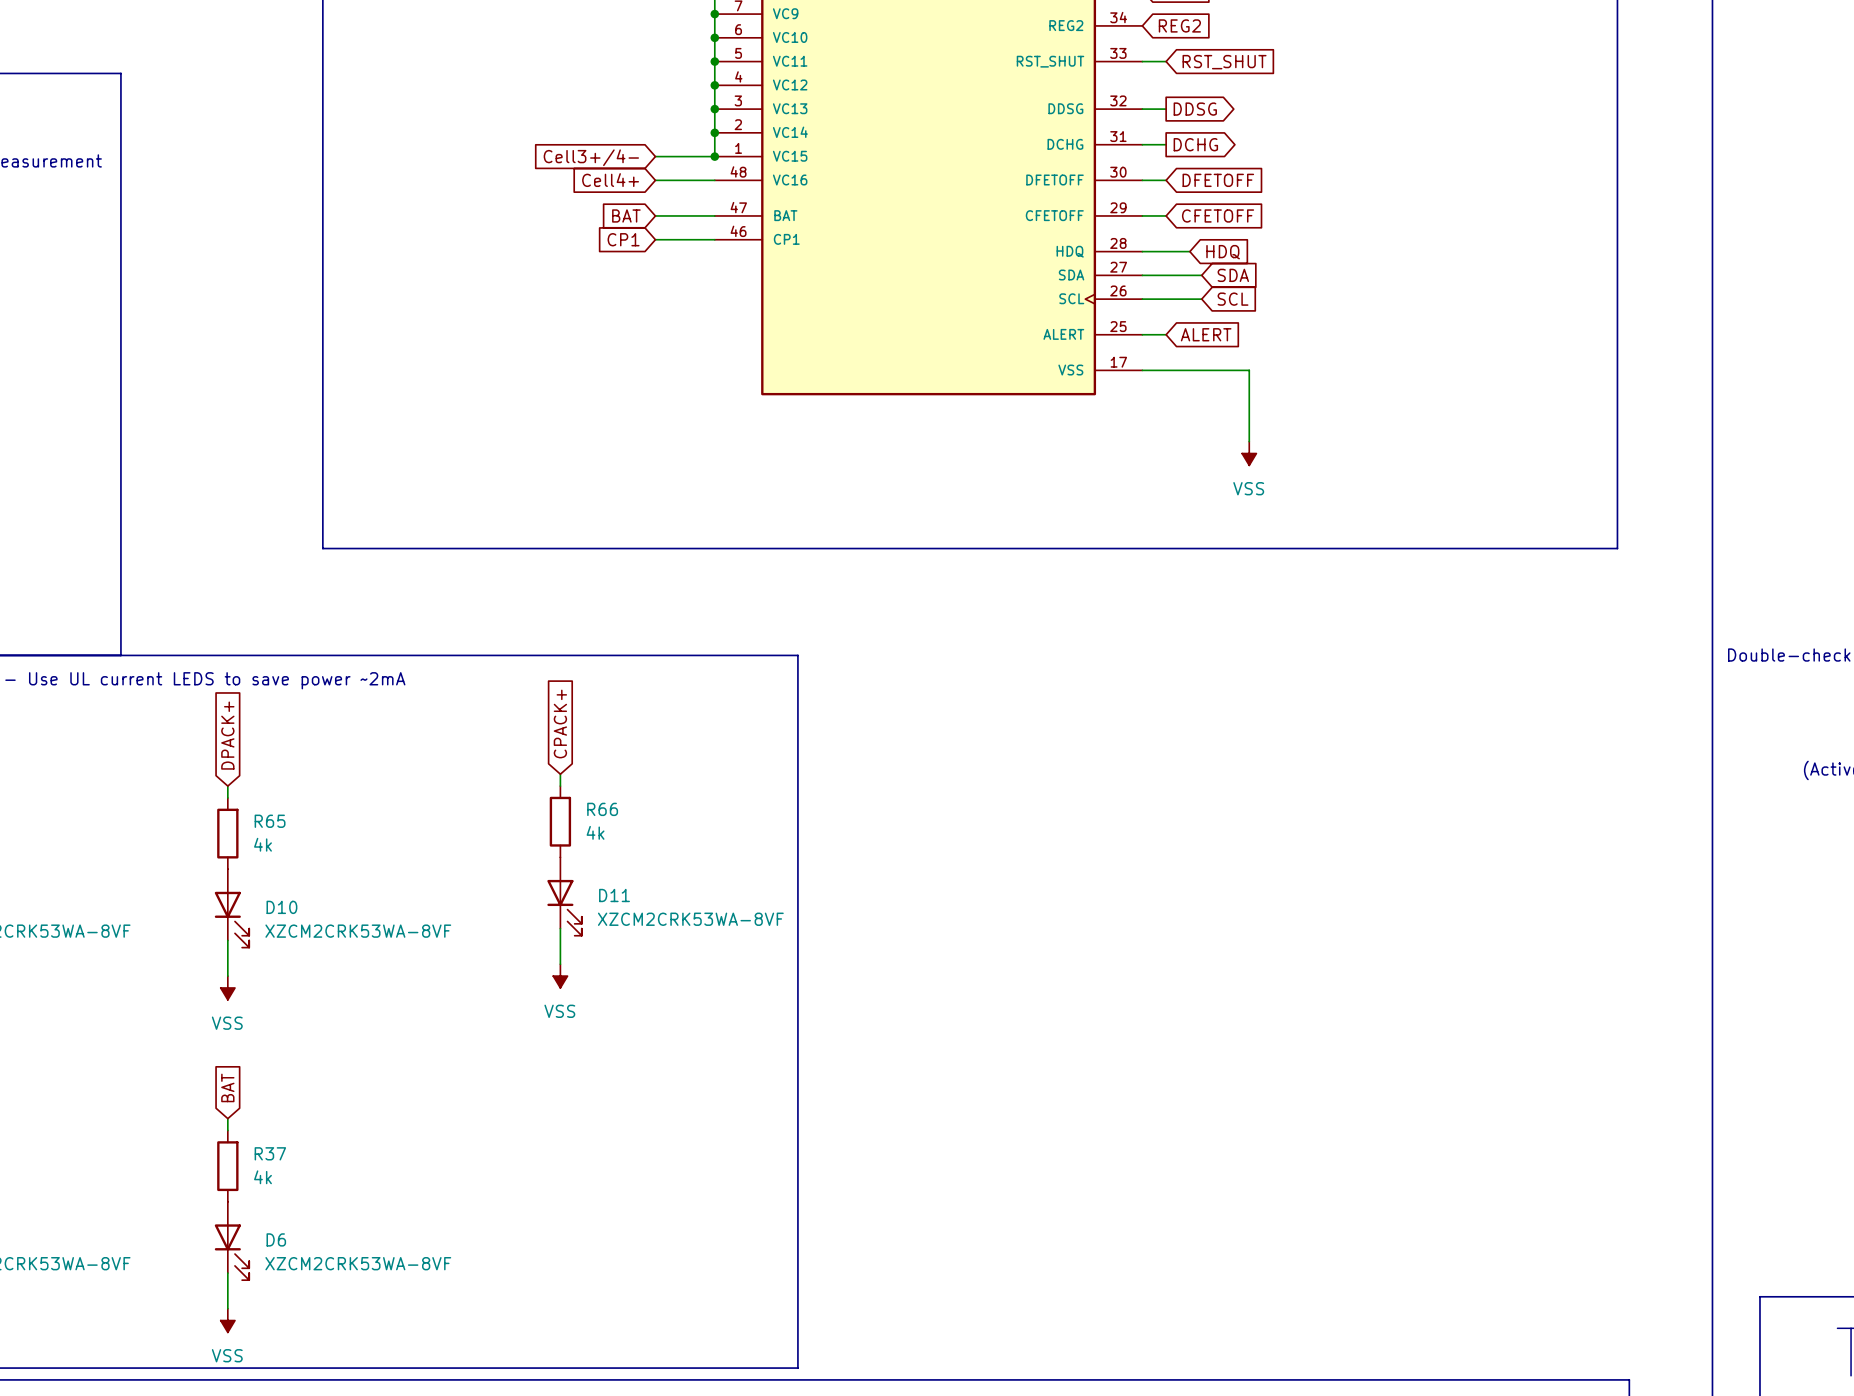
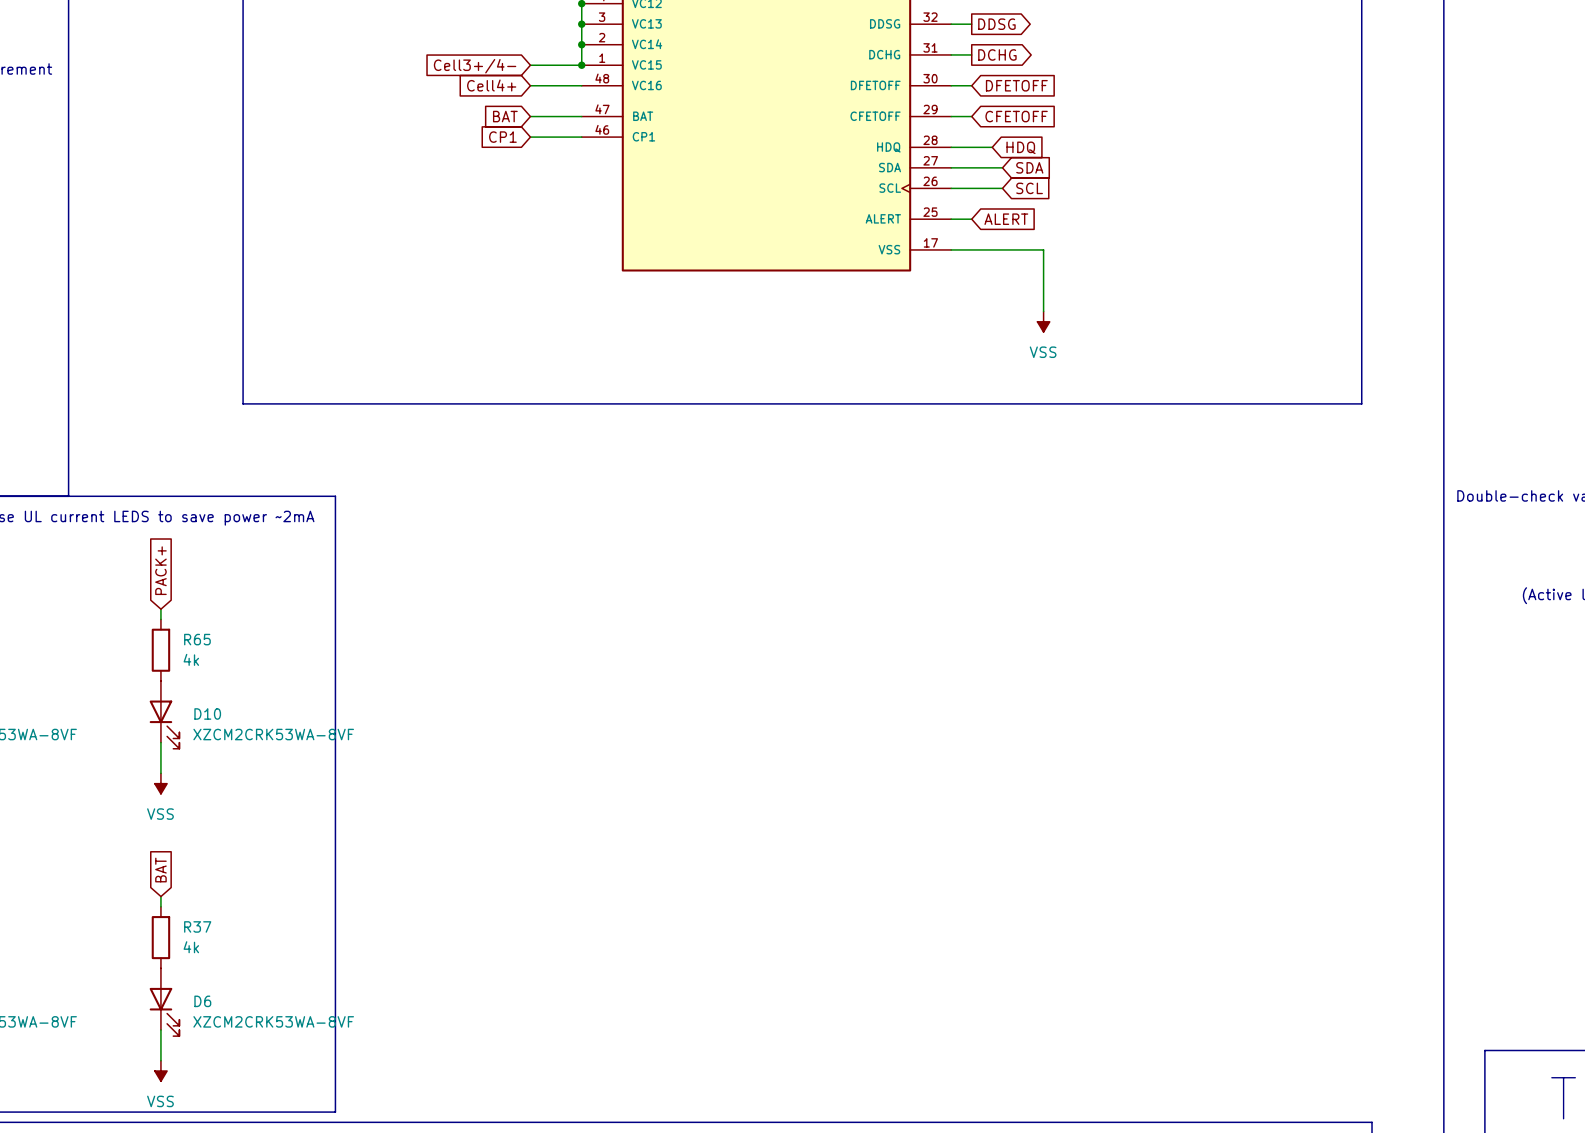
line: (429, 655) (797, 655) (797, 1368) (429, 1368) -> (335, 496) (335, 1112)
global label: CPACK+ (560, 723) -> none
global label: DPACK+ (227, 735) -> PACK+ (160, 570)
wire: (560, 774) (560, 786) -> none
R66: 4k (560, 821) -> none
D11: XZCM2CRK53WA-8VF (564, 896) -> none
wire: (560, 928) (560, 964) -> none
power symbol: VSS (560, 976) -> none

